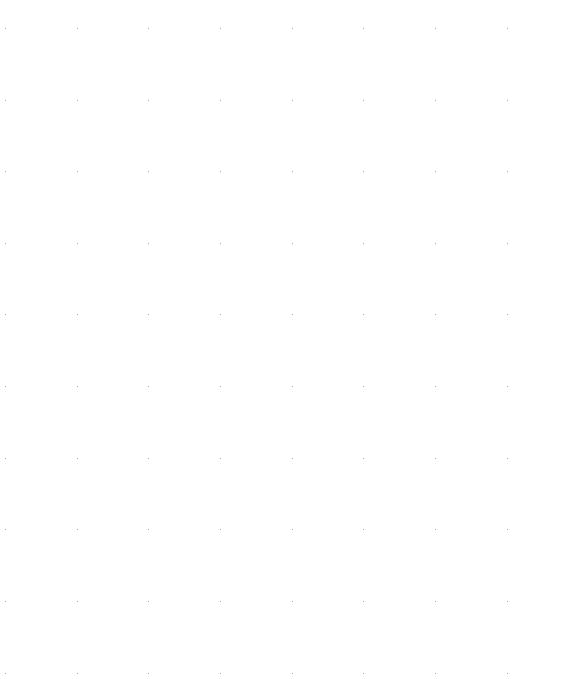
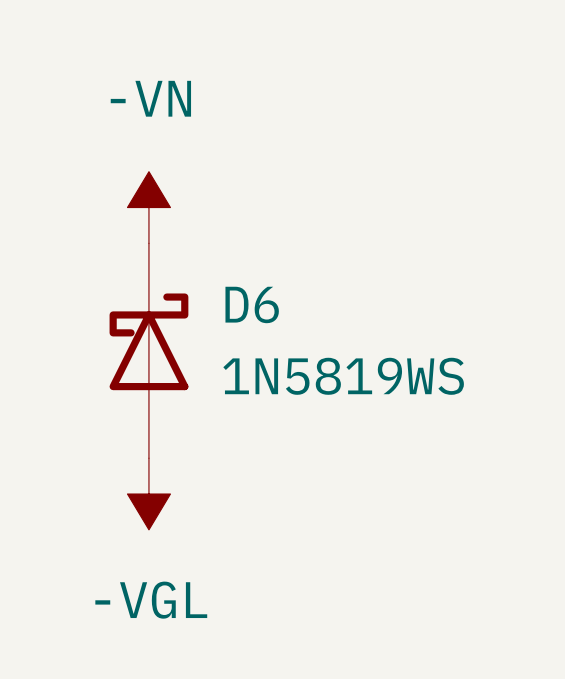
power symbol: none -> -VN (148, 207)
D6: none -> 1N5819WS (148, 350)
power symbol: none -> -VGL (148, 494)

